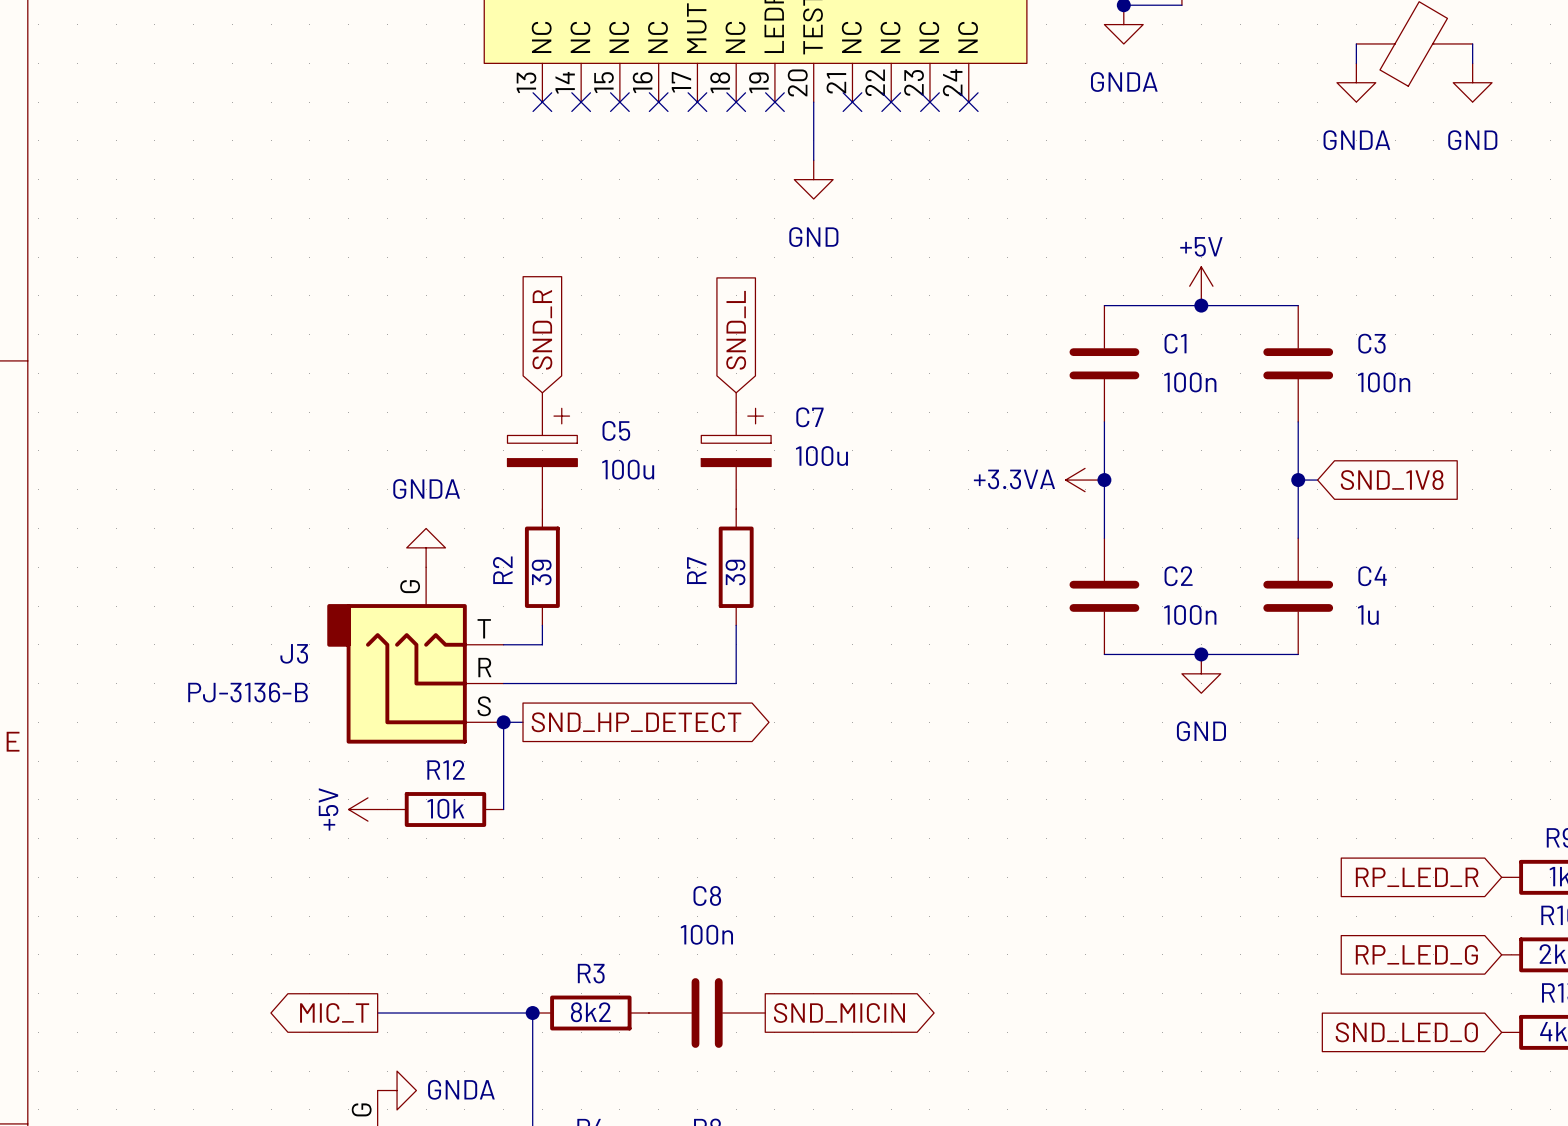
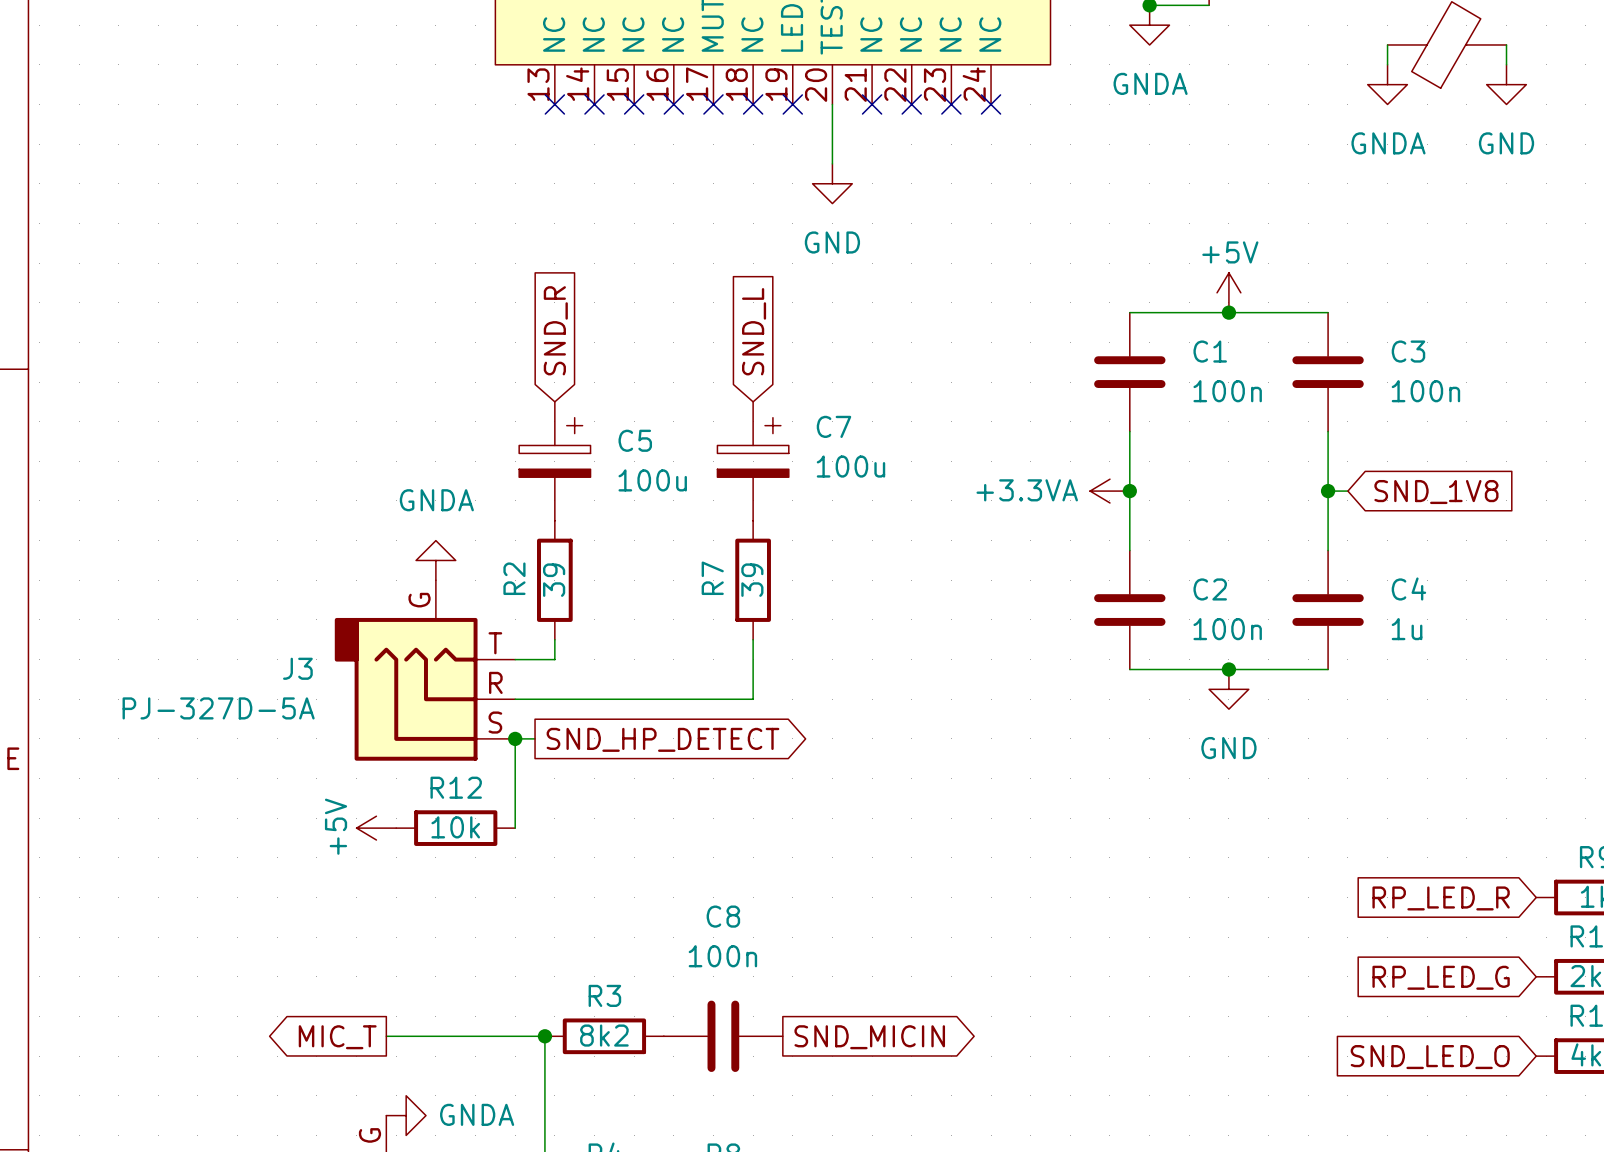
J3 value: PJ-3136-B (248, 692) -> PJ-327D-5A (218, 708)

